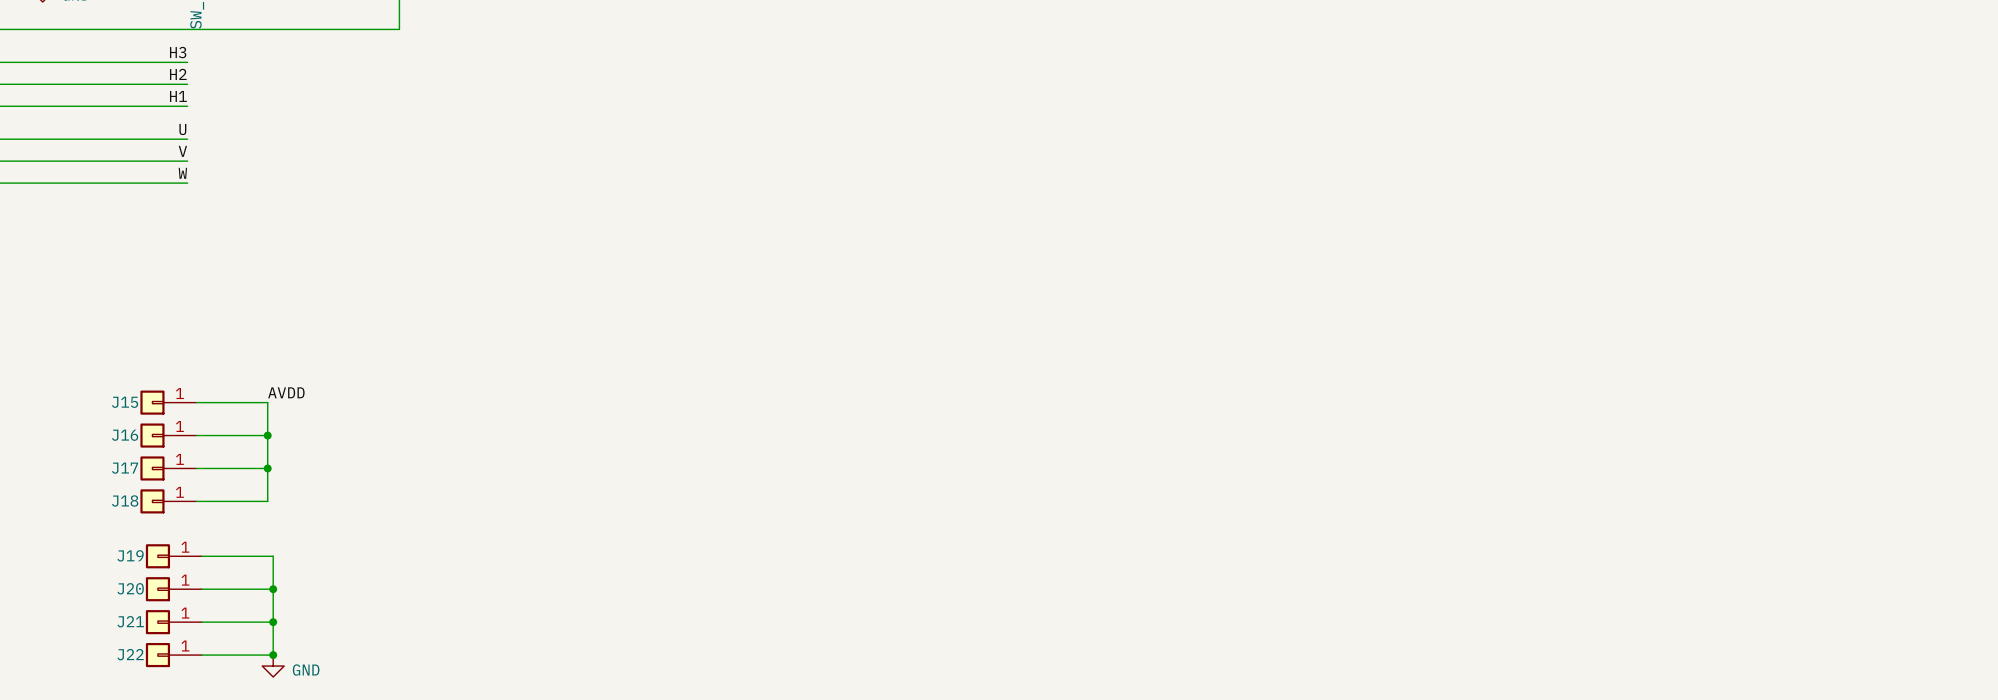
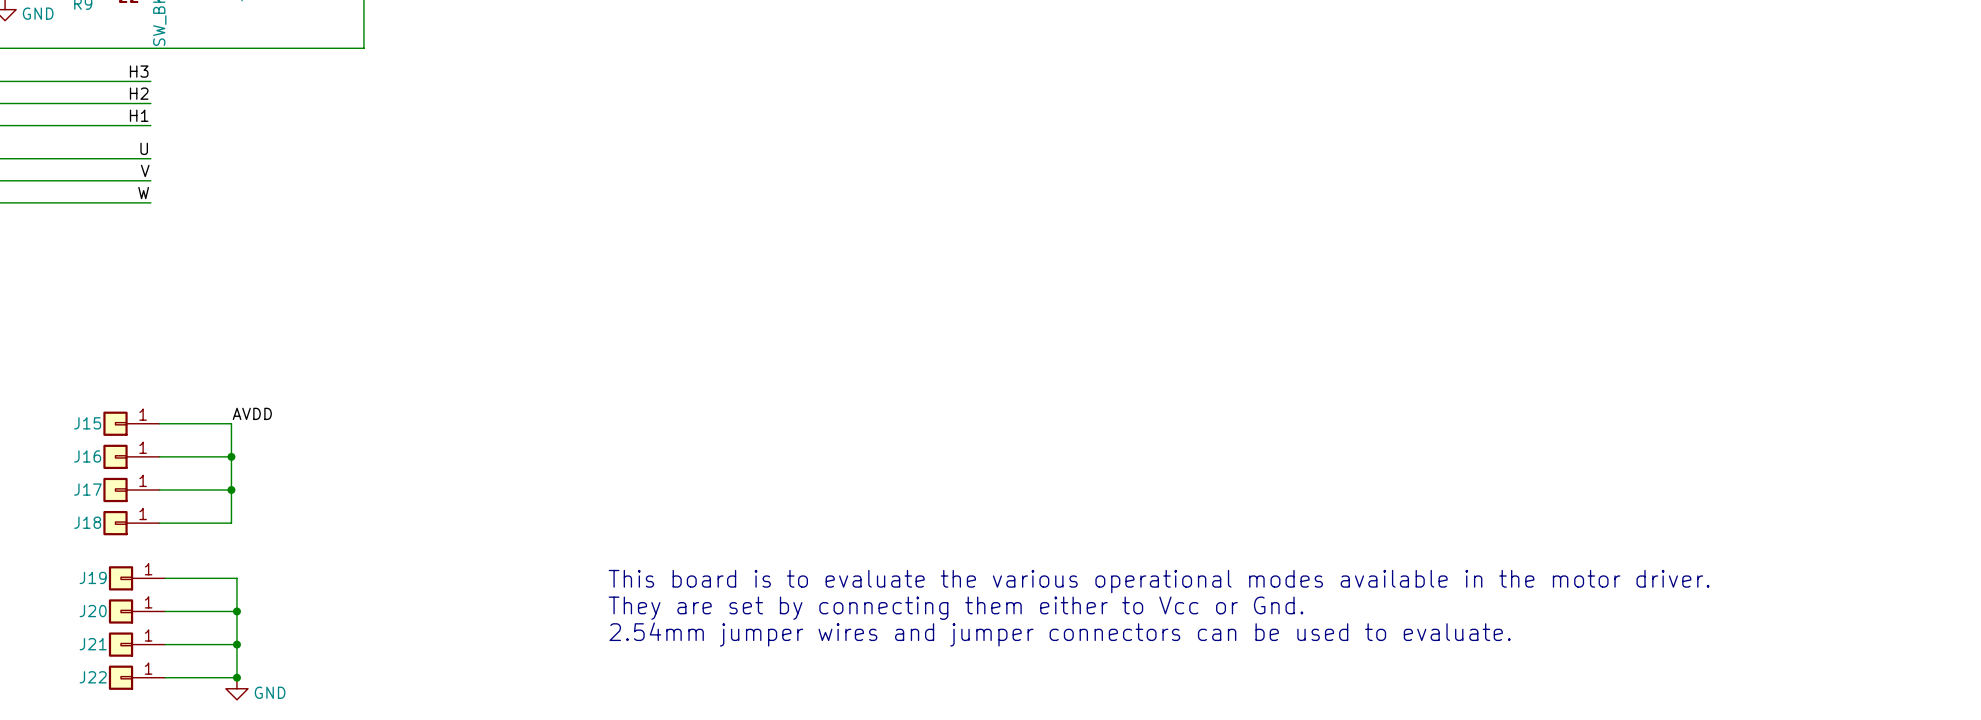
text: none -> This board is to evaluate the various operational modes available in the motor driver. (1159, 581)
text: none -> They are set by connecting them either to Vcc or Gnd. (956, 608)
text: none -> 2.54mm jumper wires and jumper connectors can be used to evaluate. (1060, 634)

